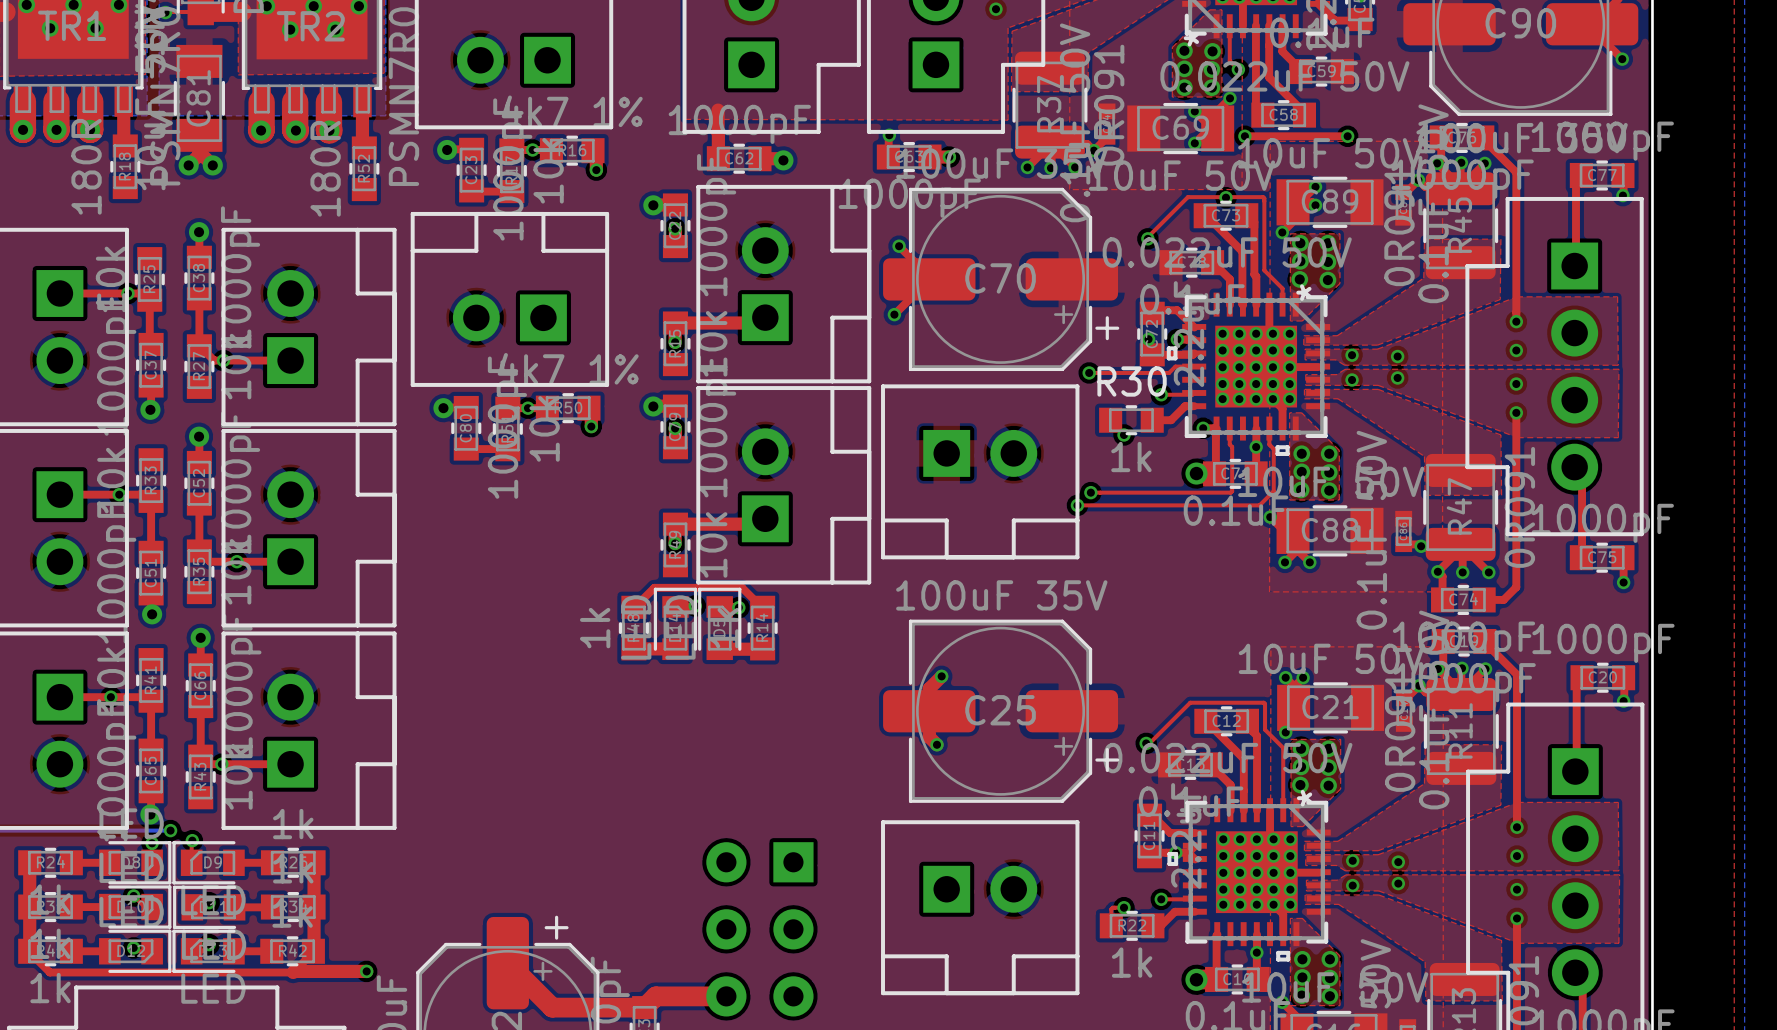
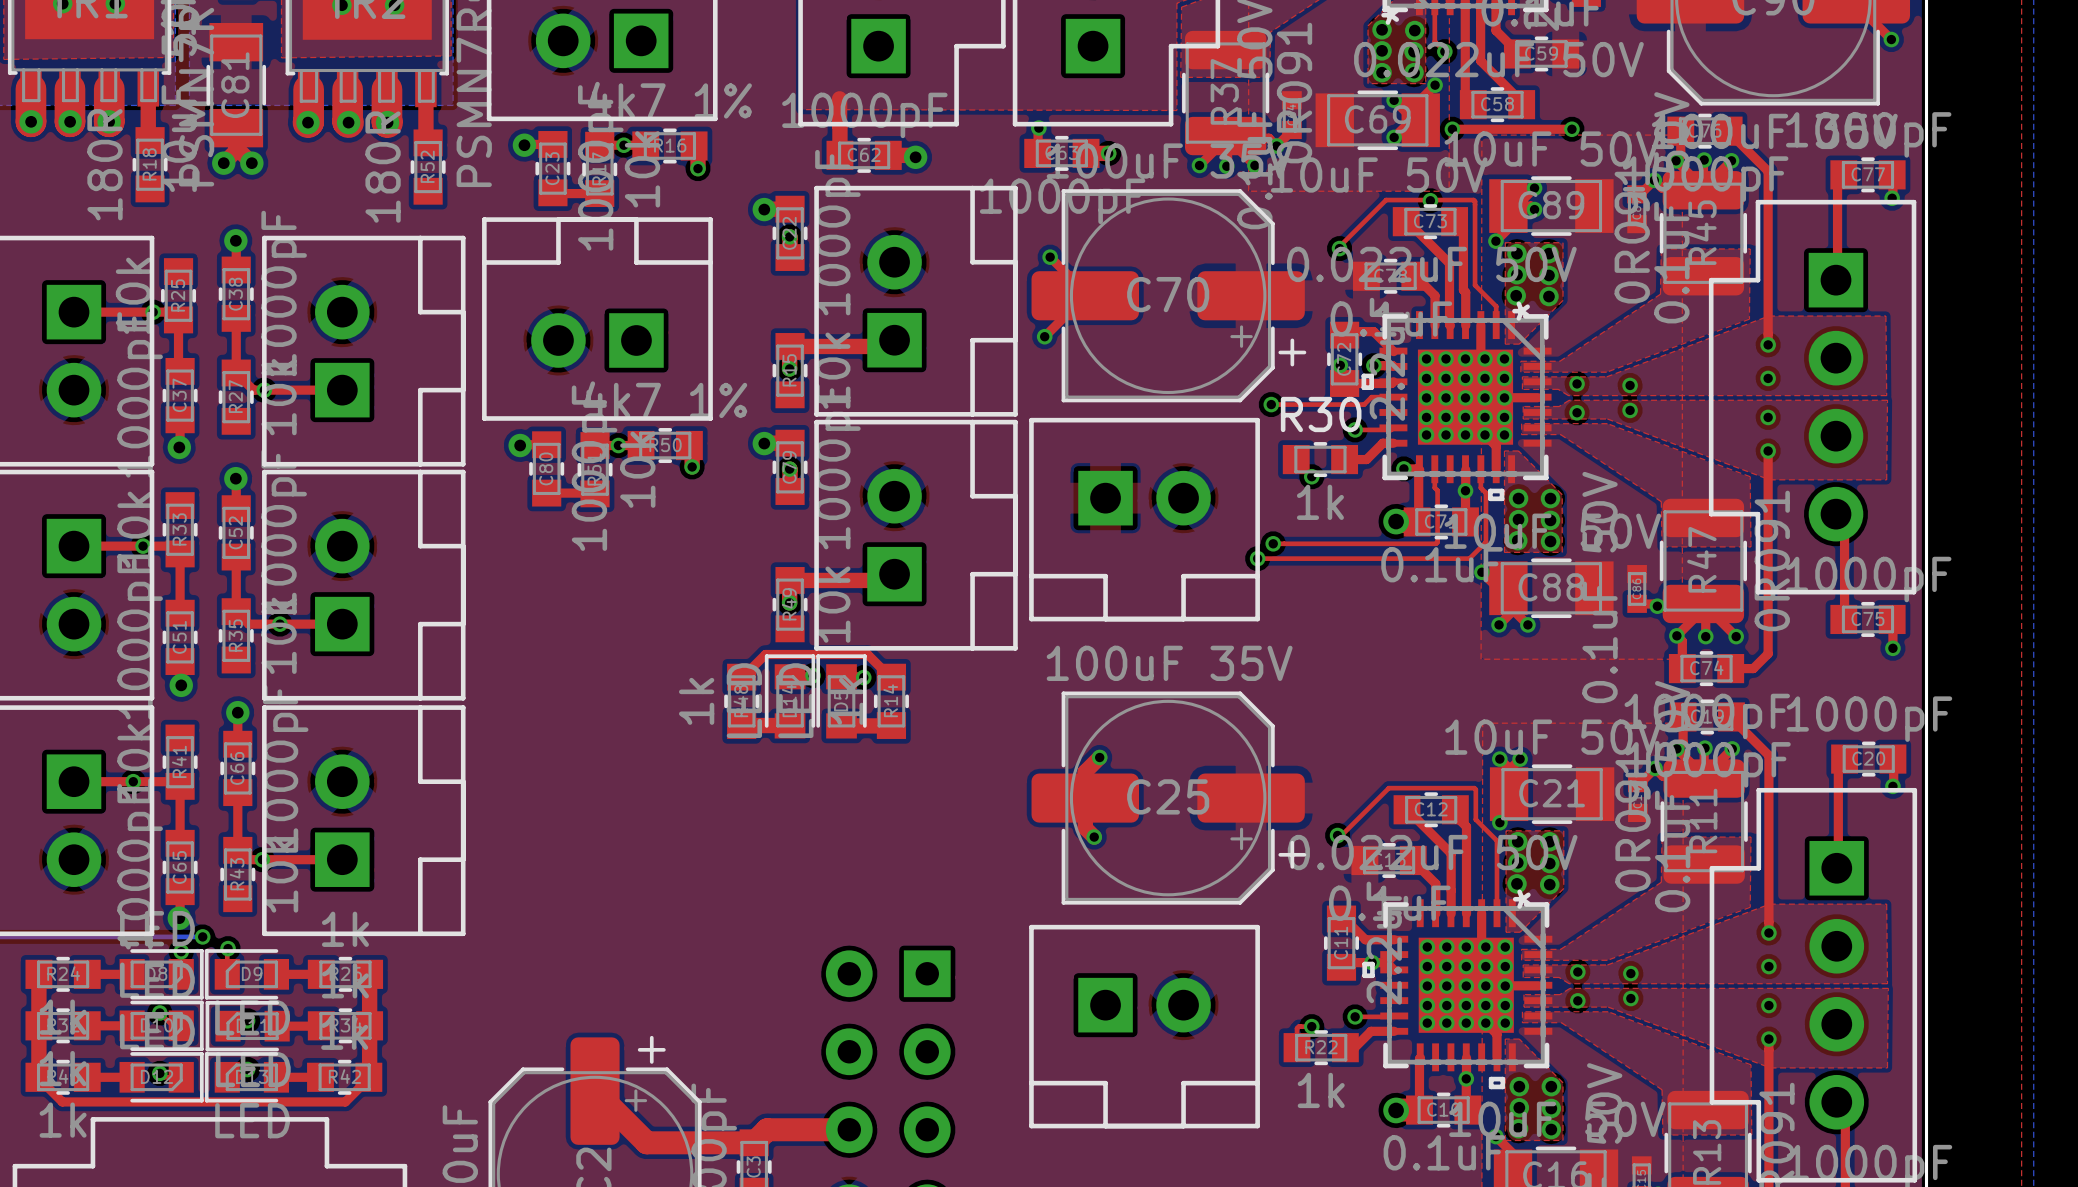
top track: (366, 971) (293, 972) -> none
via: (366, 971) -> none

